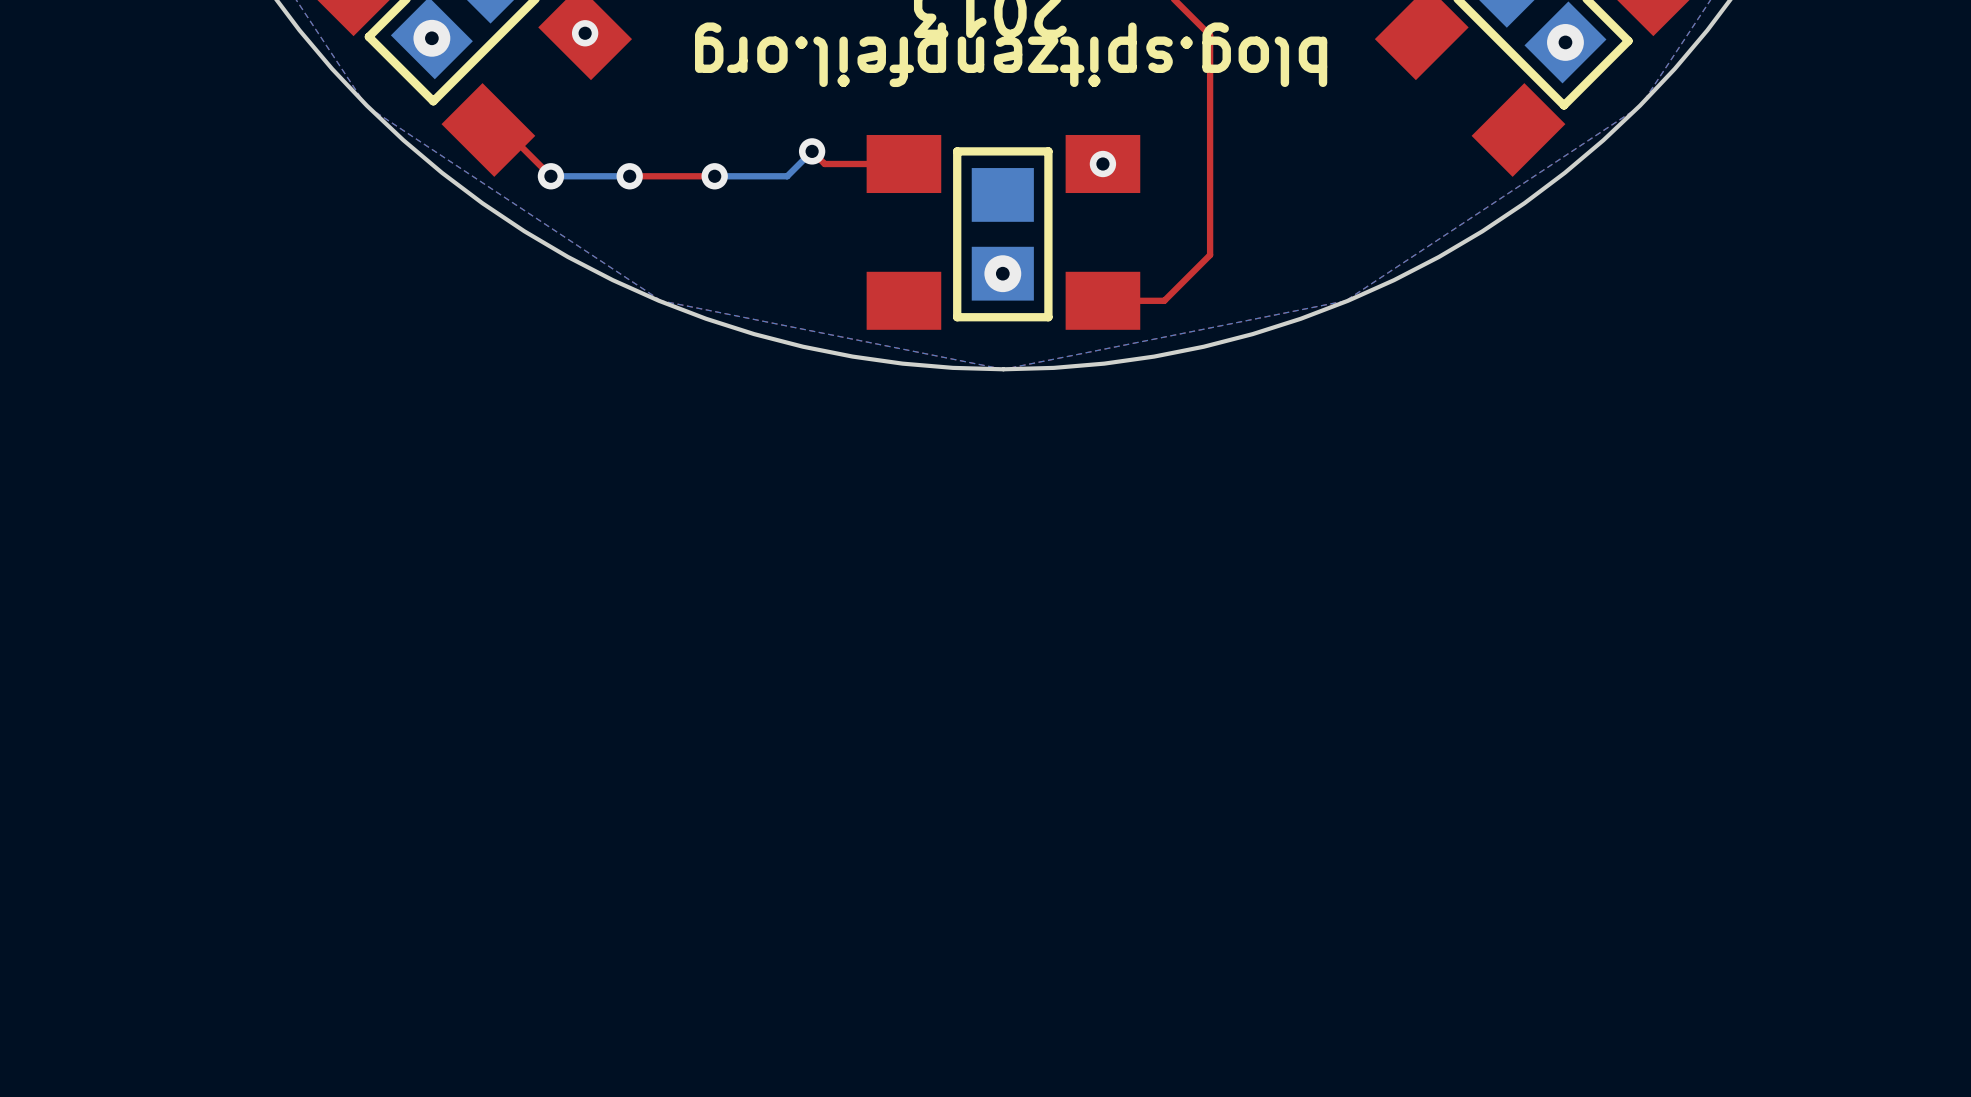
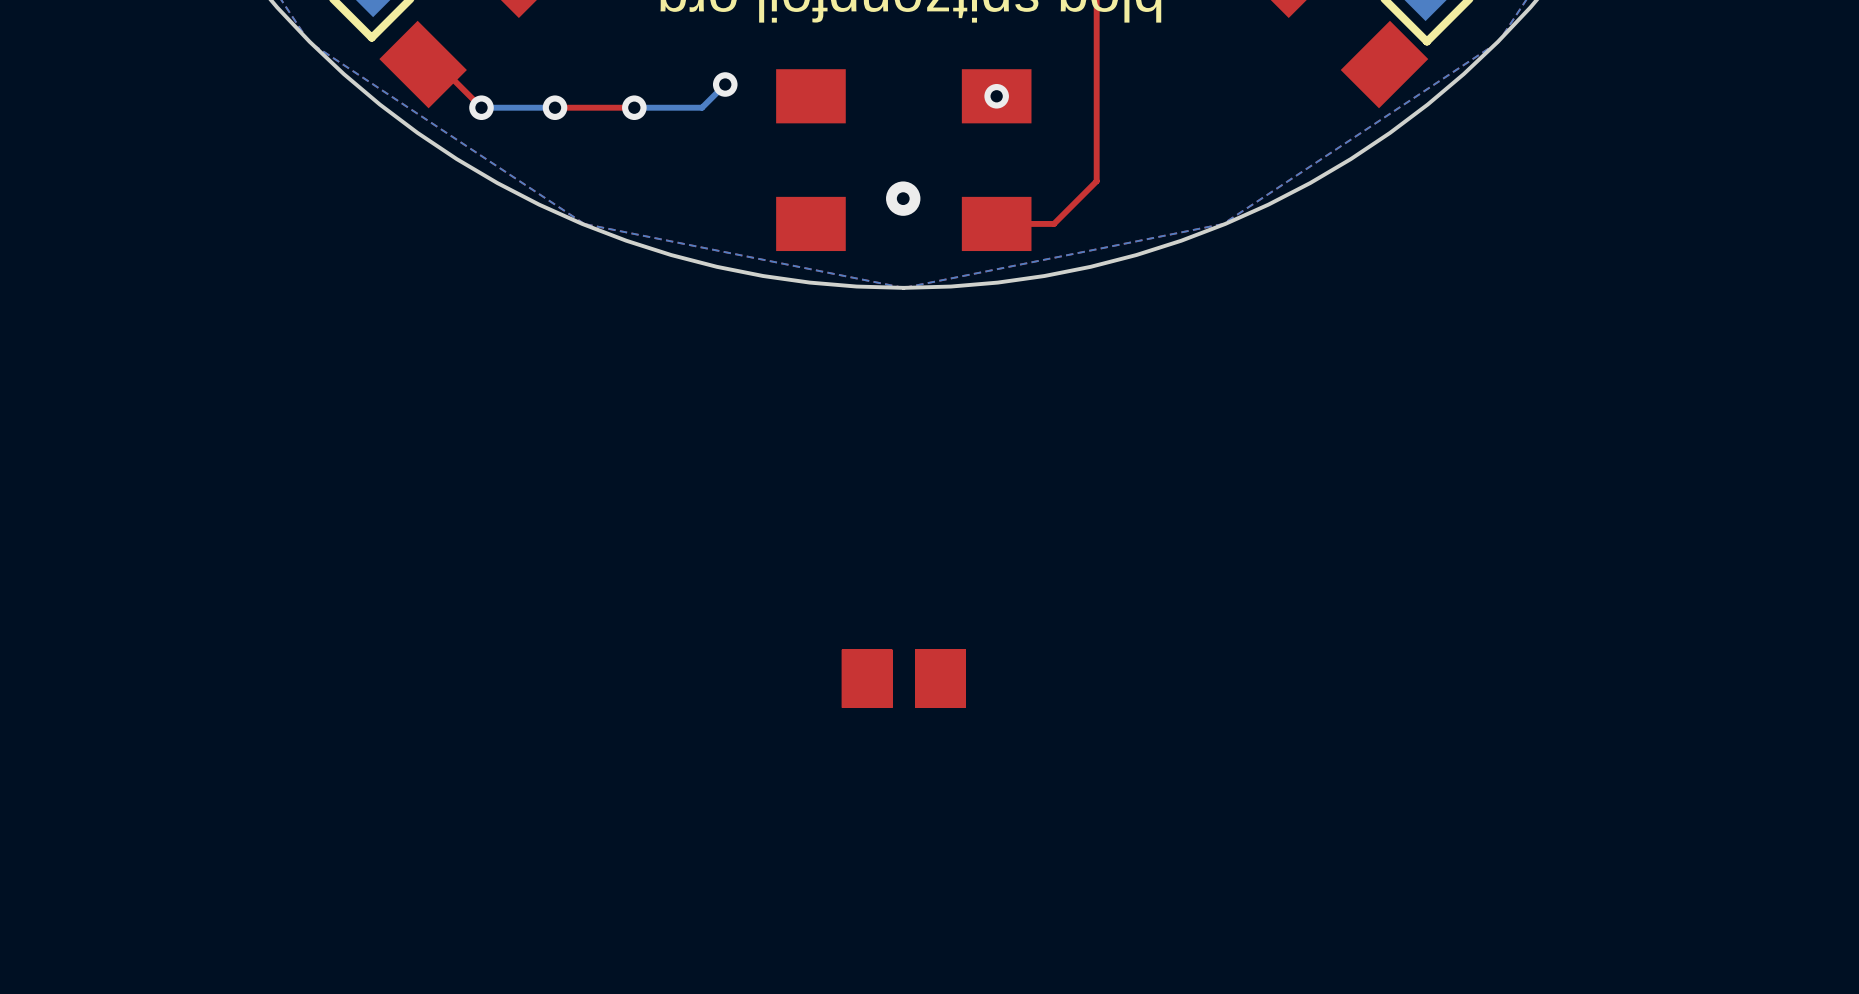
top track: (812, 151) (824, 164) (903, 164) -> none
part side: bottom (1002, 234) -> top (903, 678)

